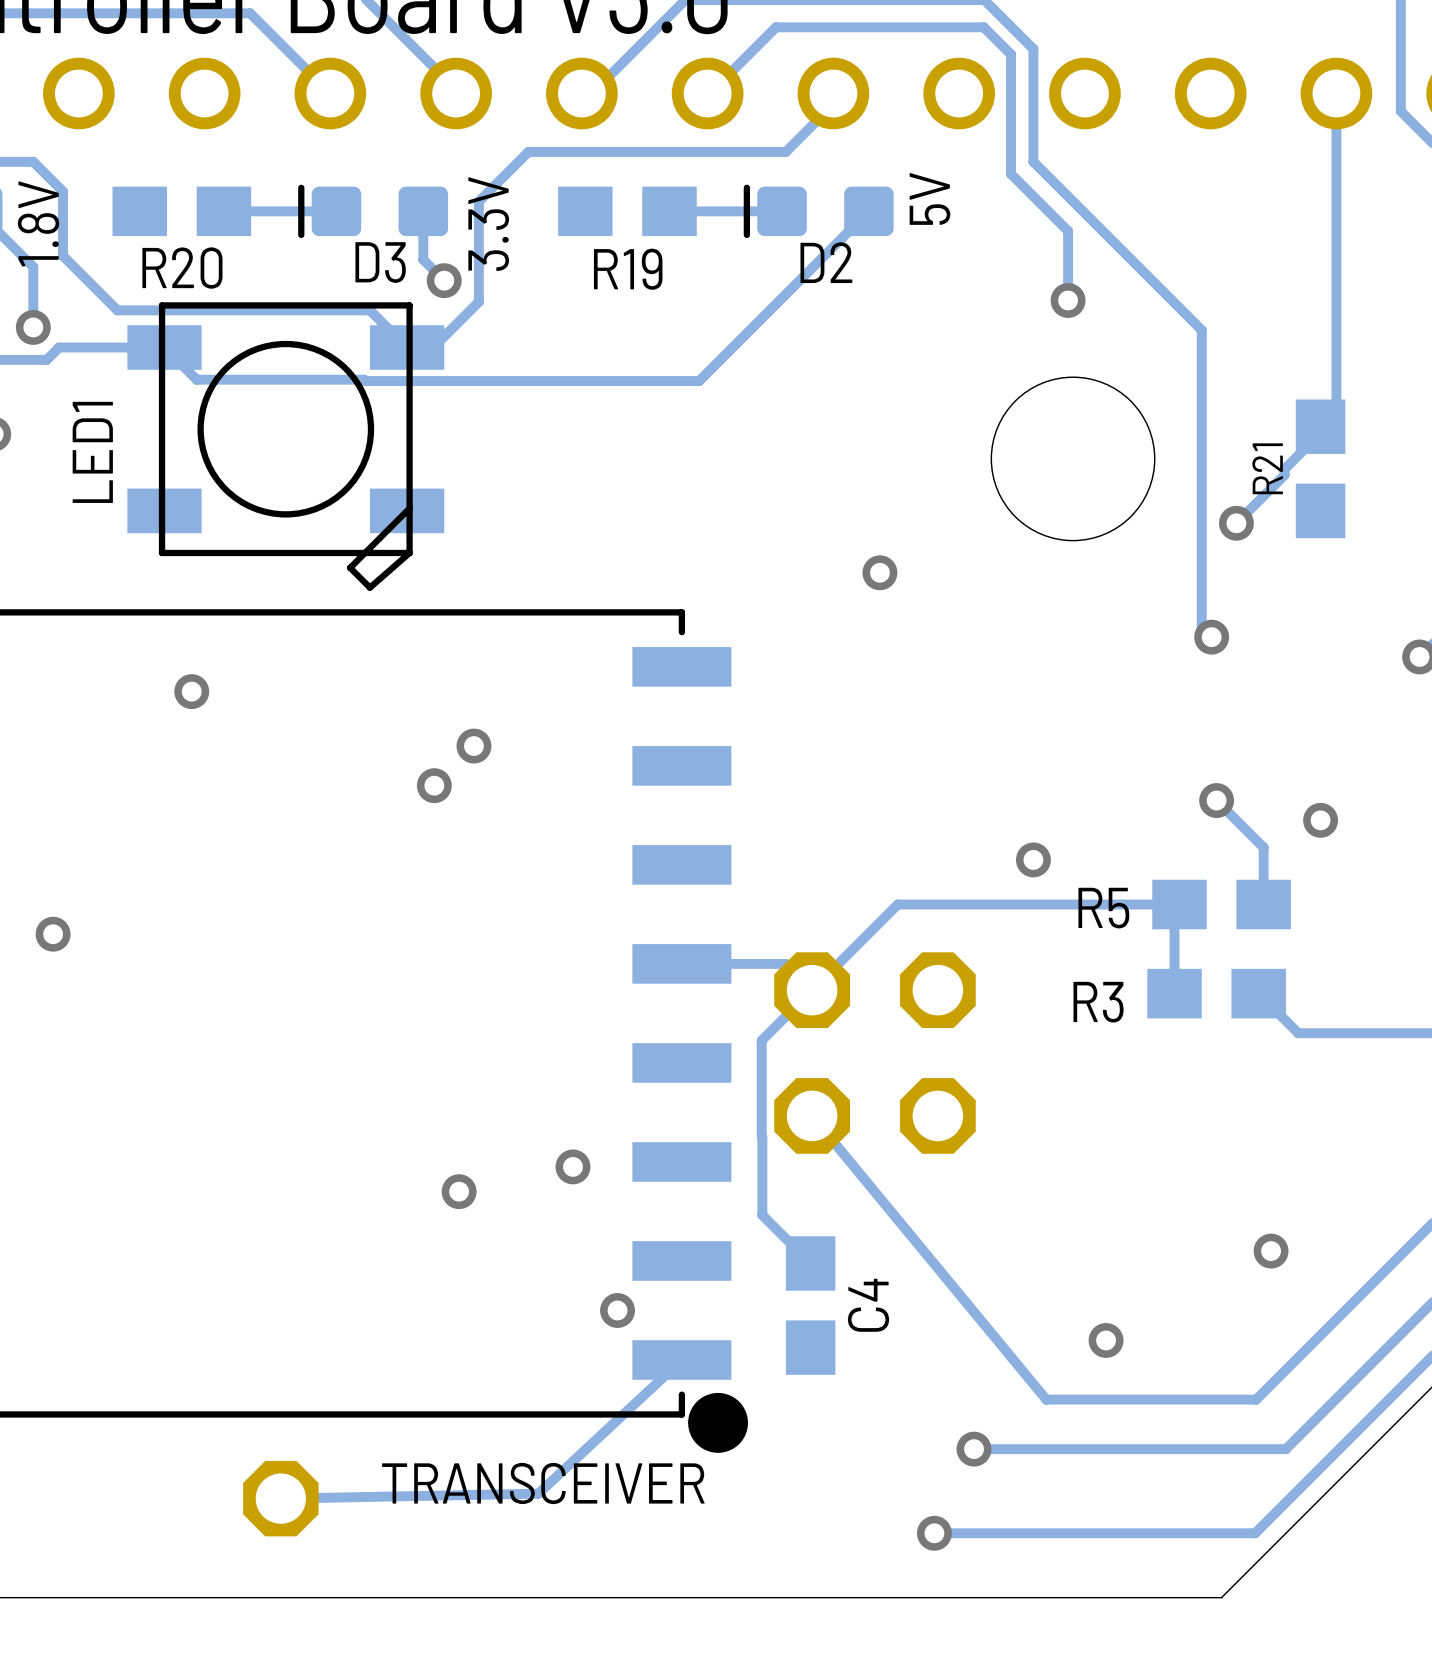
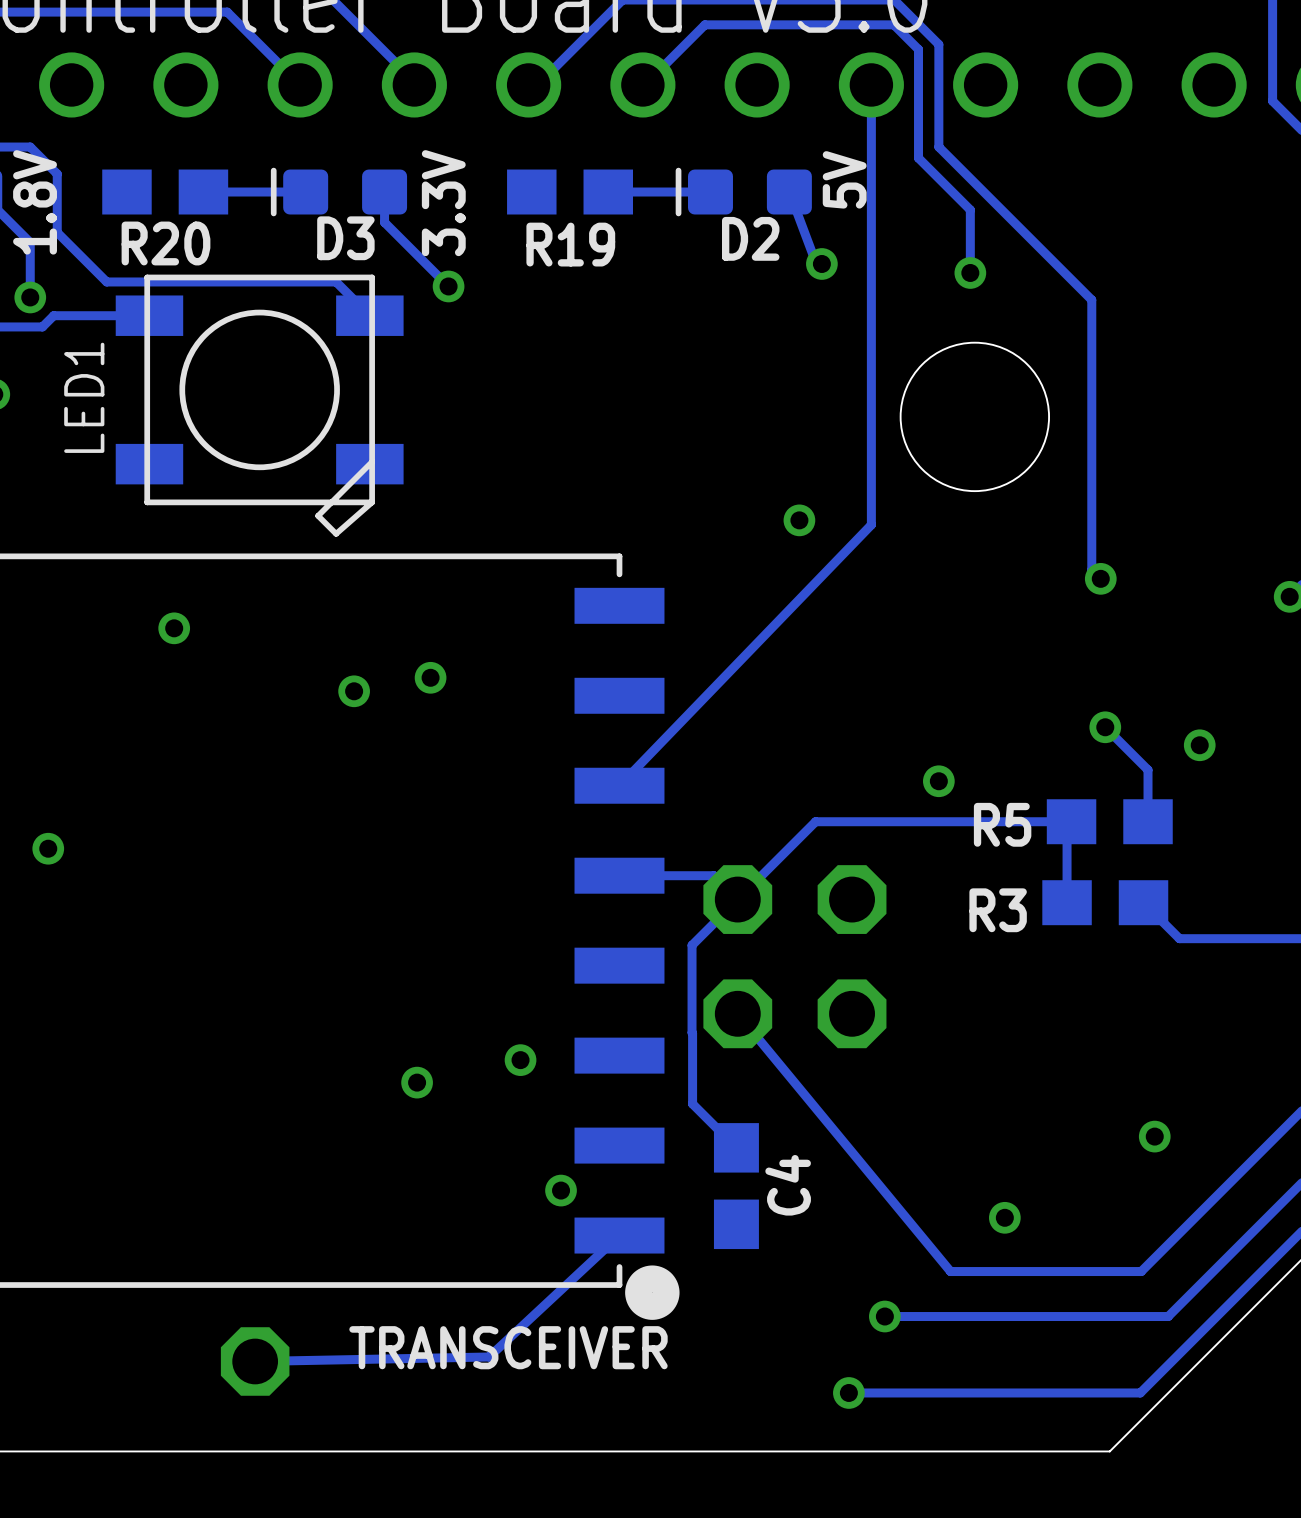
track: (833, 93) (833, 104) (785, 151) (528, 151) (478, 201) (478, 301) (433, 347) (407, 347) -> none
track: none -> (871, 84) (871, 524) (619, 785)
track: (1336, 93) (1336, 400) (1320, 426) (1320, 433) (1284, 469) (1284, 475) (1236, 523) -> none
track: (868, 211) (699, 381) (196, 379) (164, 347) -> (789, 192) (816, 263) (821, 263)
track: (423, 244) (423, 259) (444, 280) -> (384, 222) (448, 286)
via position: (444, 280) -> (448, 286)
via: none -> (821, 263)
R21: (1320, 468) -> none
via: (1236, 523) -> none
via position: (434, 785) -> (354, 691)

